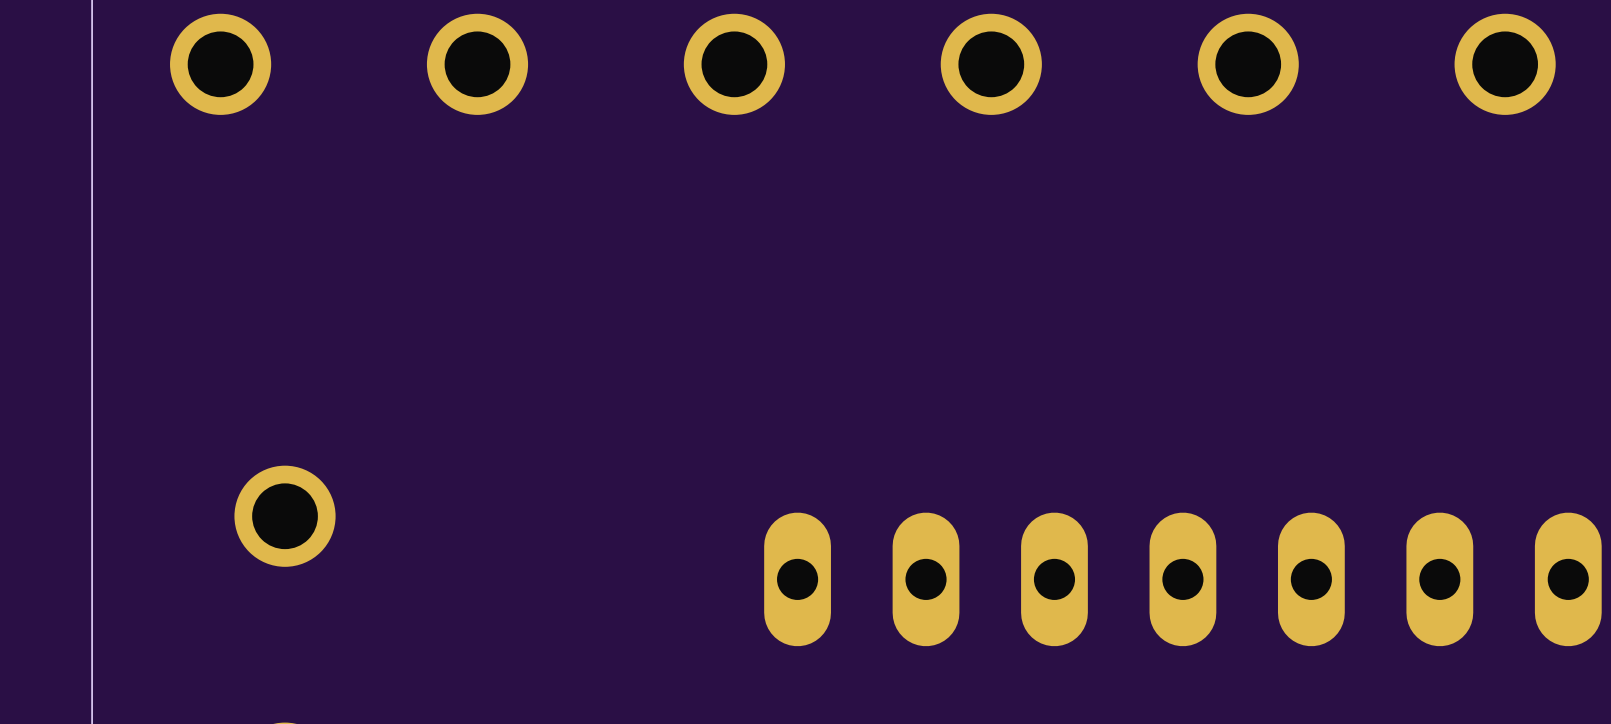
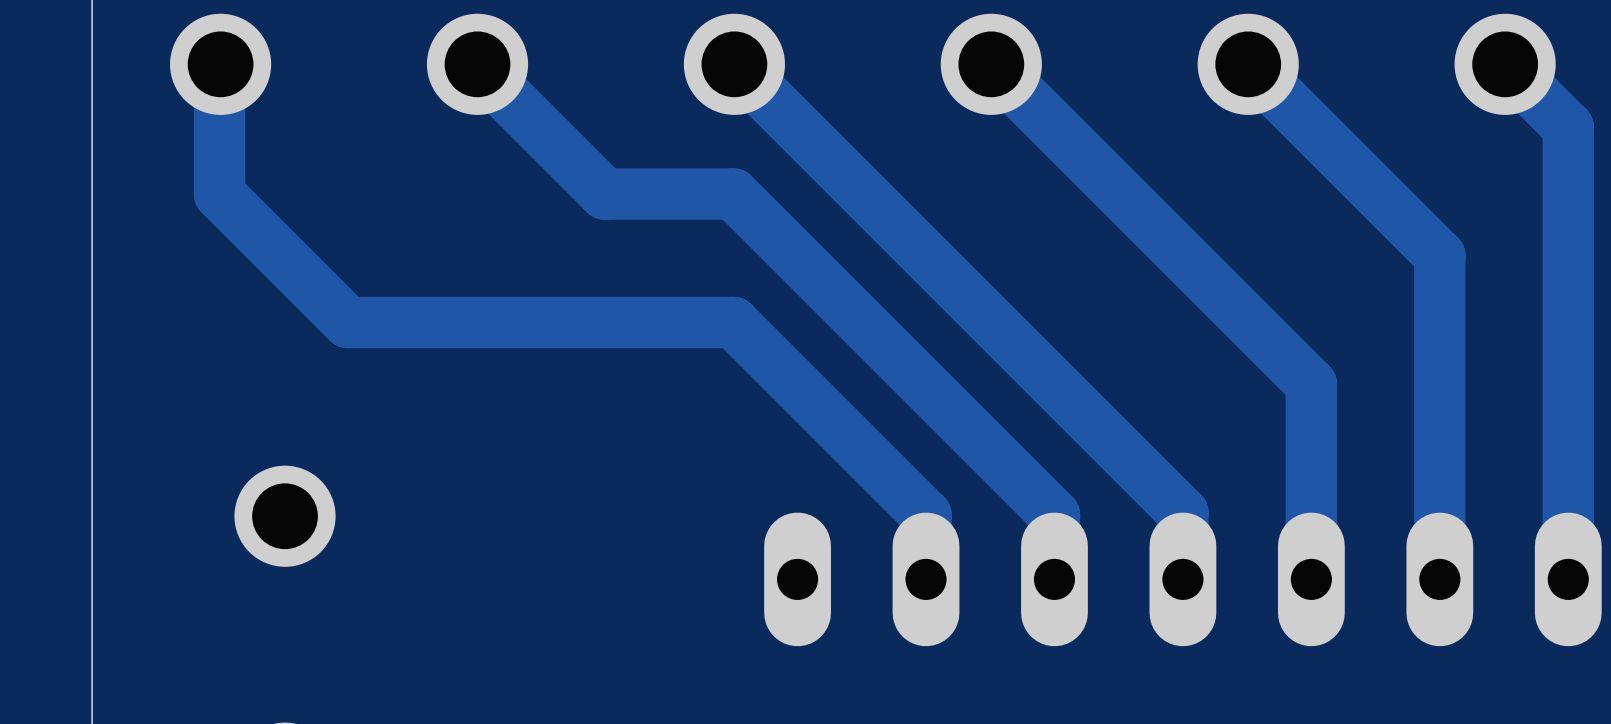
track: none -> (220, 64) (219, 194) (347, 322) (733, 322) (926, 515) (926, 579)
track: none -> (477, 64) (477, 66) (604, 194) (733, 194) (1054, 515) (1054, 579)
track: none -> (734, 64) (1182, 512) (1182, 579)
track: none -> (991, 64) (1311, 384) (1311, 579)
track: none -> (1248, 64) (1439, 255) (1439, 579)
track: none -> (1505, 64) (1568, 127) (1568, 579)

